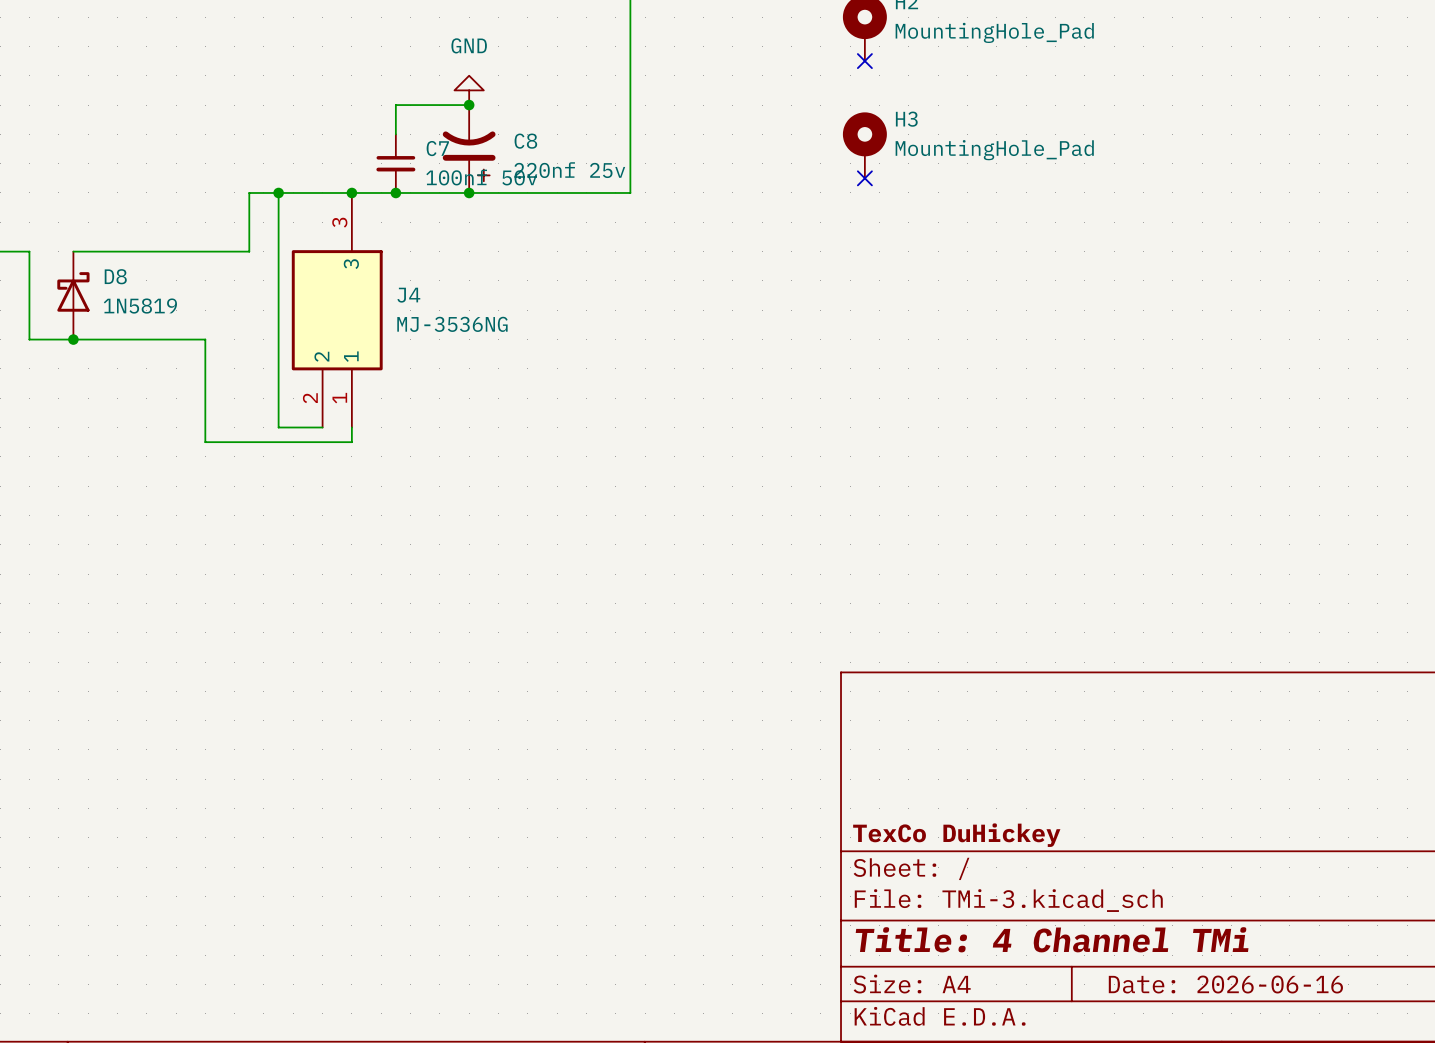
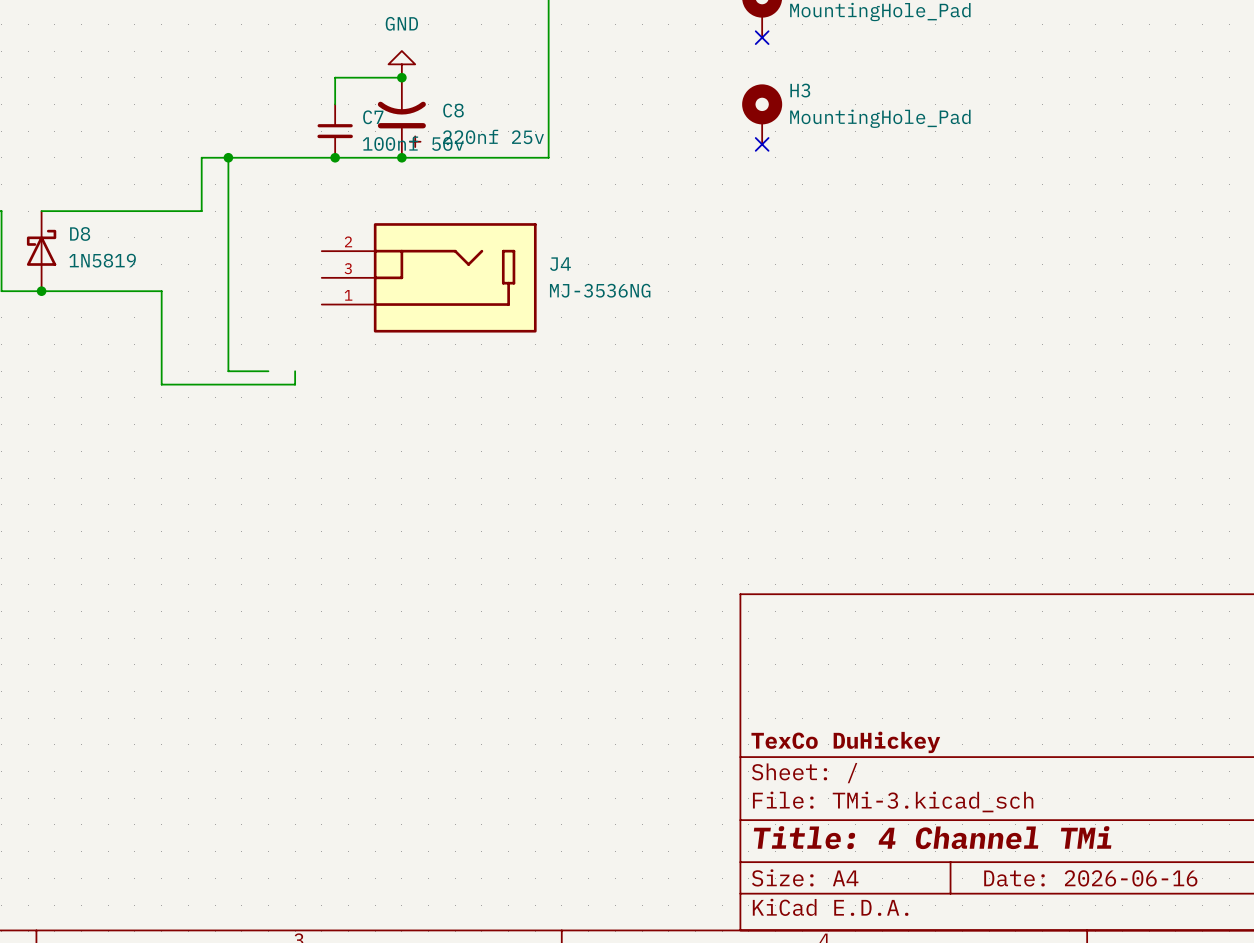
J4 symbol: [291, 192, 383, 428] -> [321, 223, 537, 333]
junction: (351, 192) -> none
J4 name position: J4 (408, 295) -> J4 (560, 264)
J4 value position: MJ-3536NG (452, 324) -> MJ-3536NG (600, 290)

